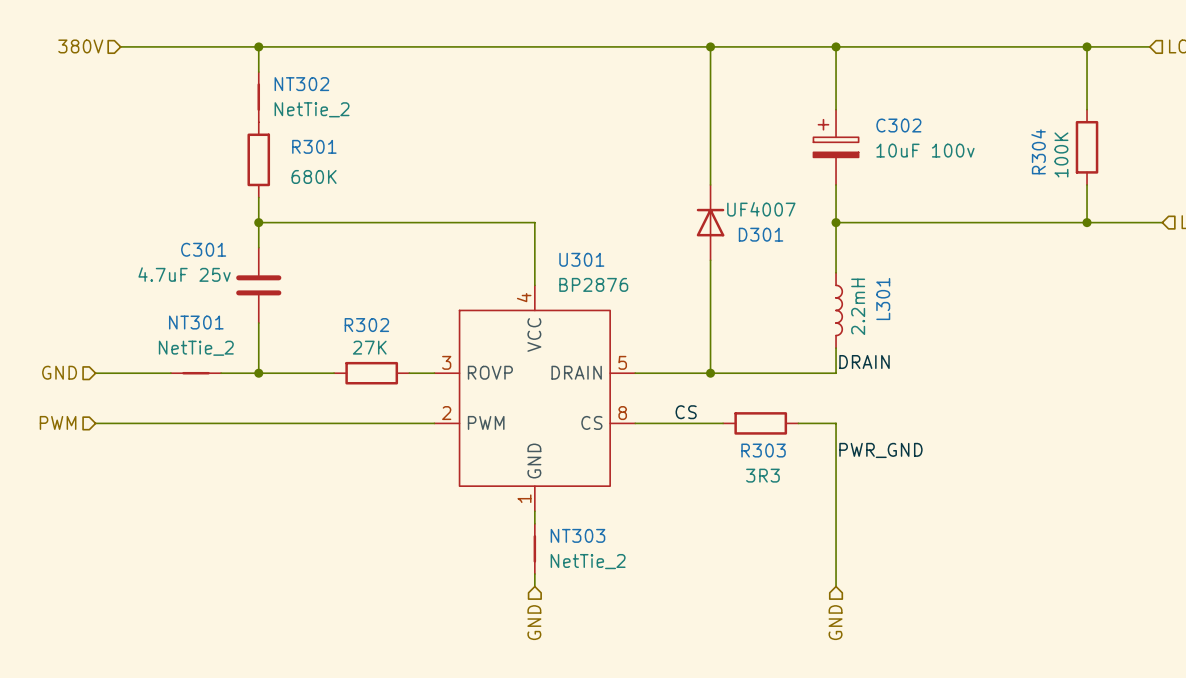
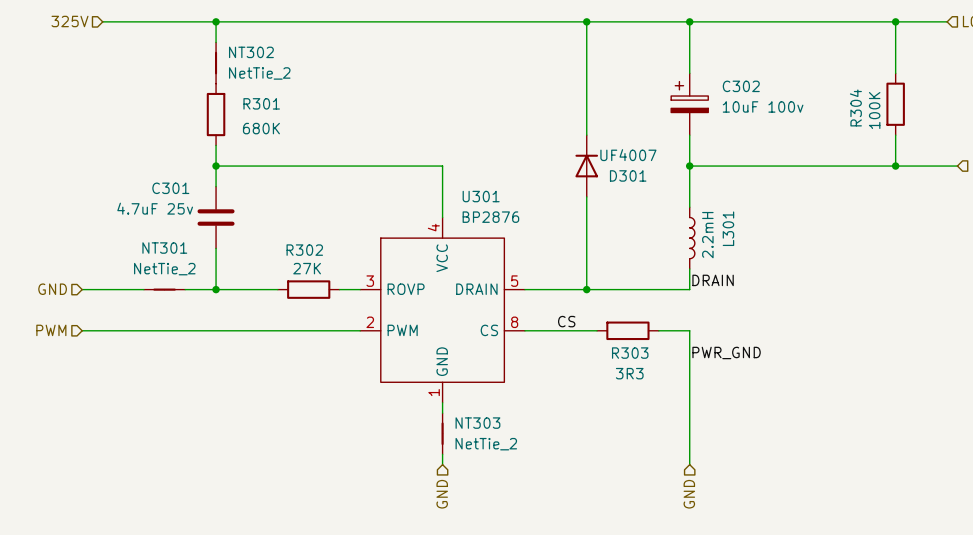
hierarchical label: 380V (80, 46) -> 325V (70, 21)

